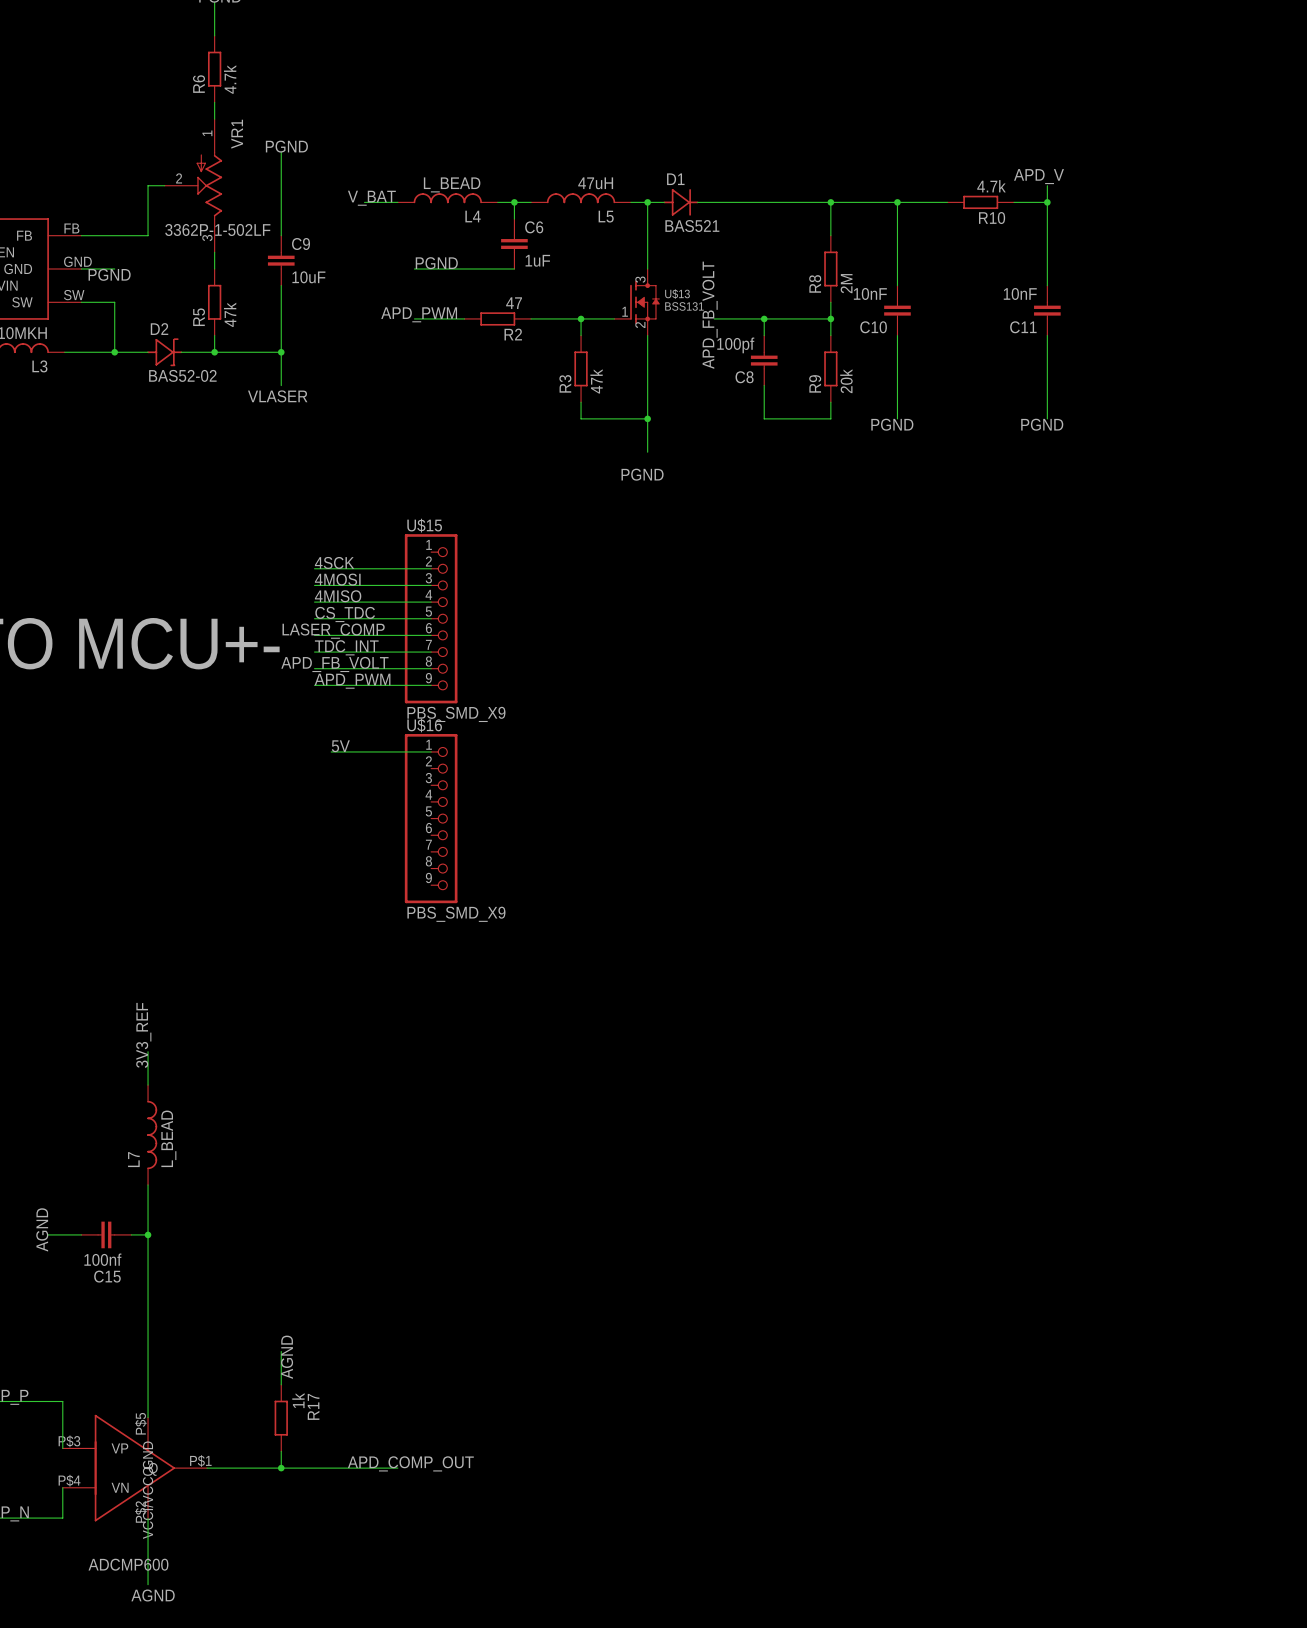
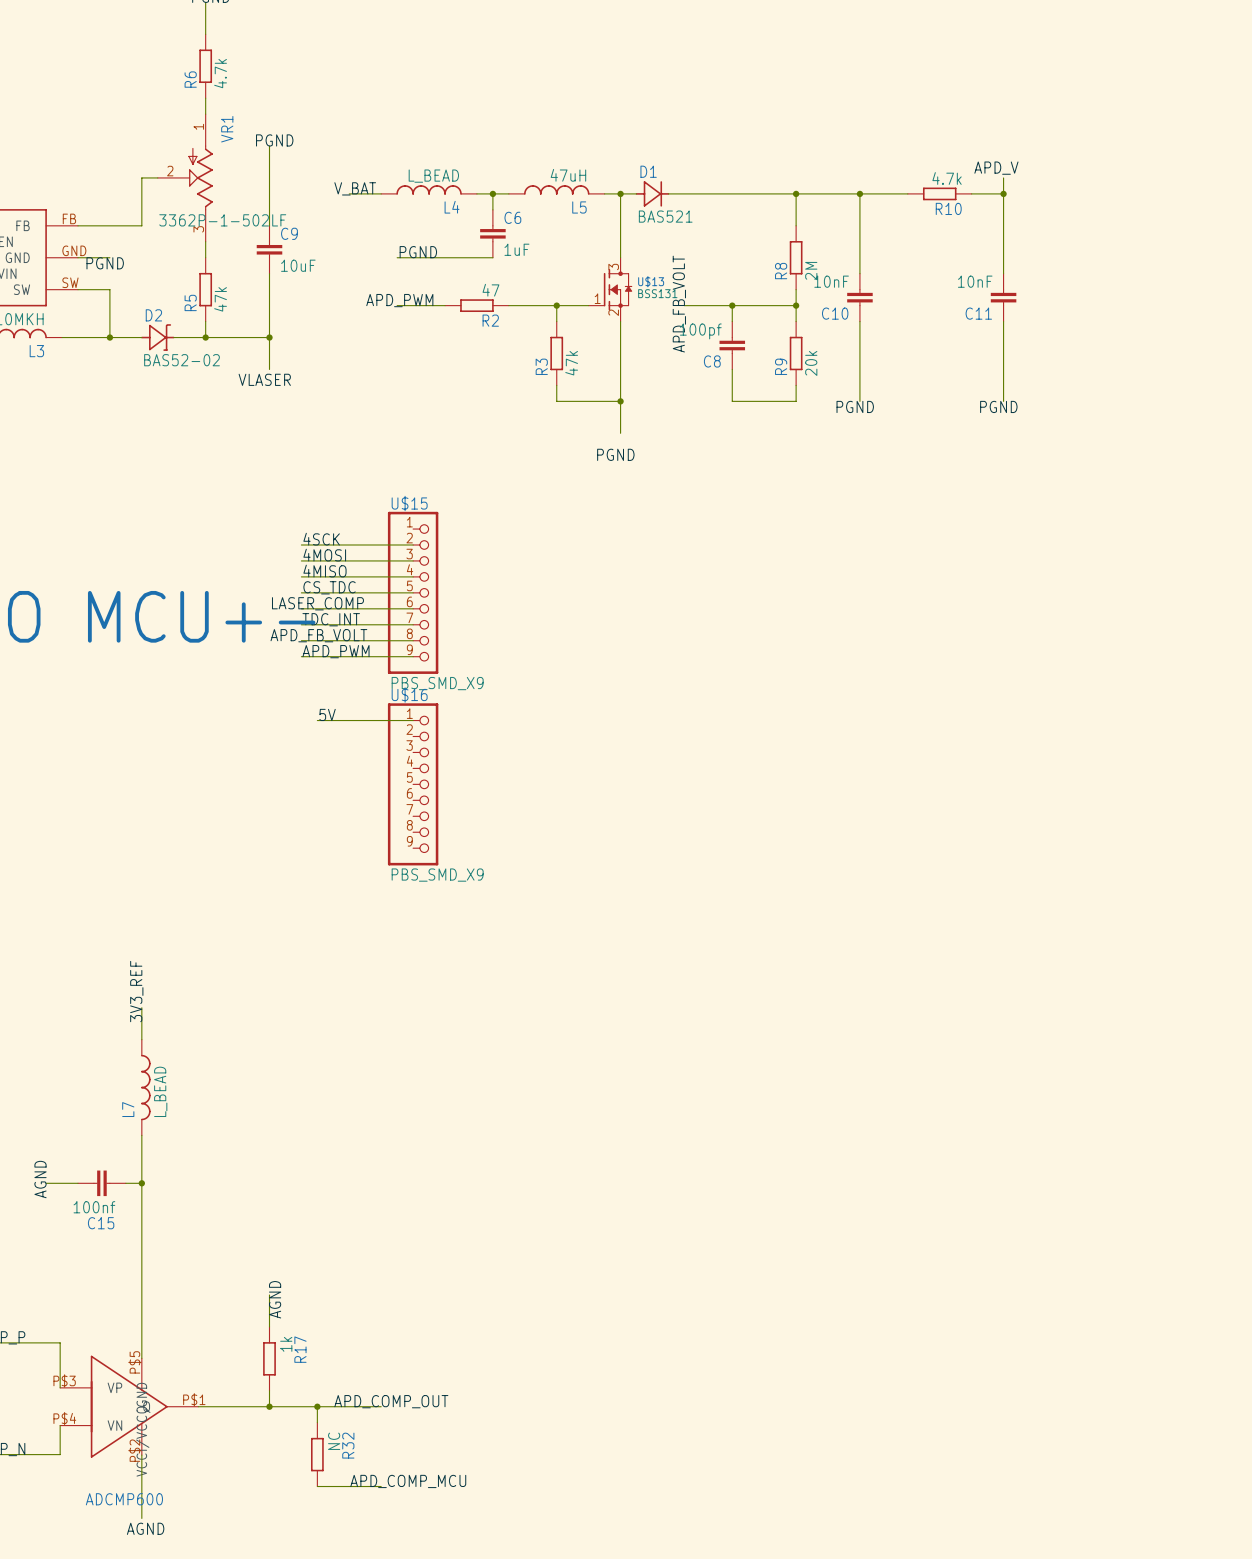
wire: none -> (317, 1406) (317, 1422)
junction: none -> (317, 1406)
R32: none -> NC (317, 1454)
label: none -> APD_COMP_MCU (408, 1481)
wire: none -> (317, 1486) (381, 1486)

